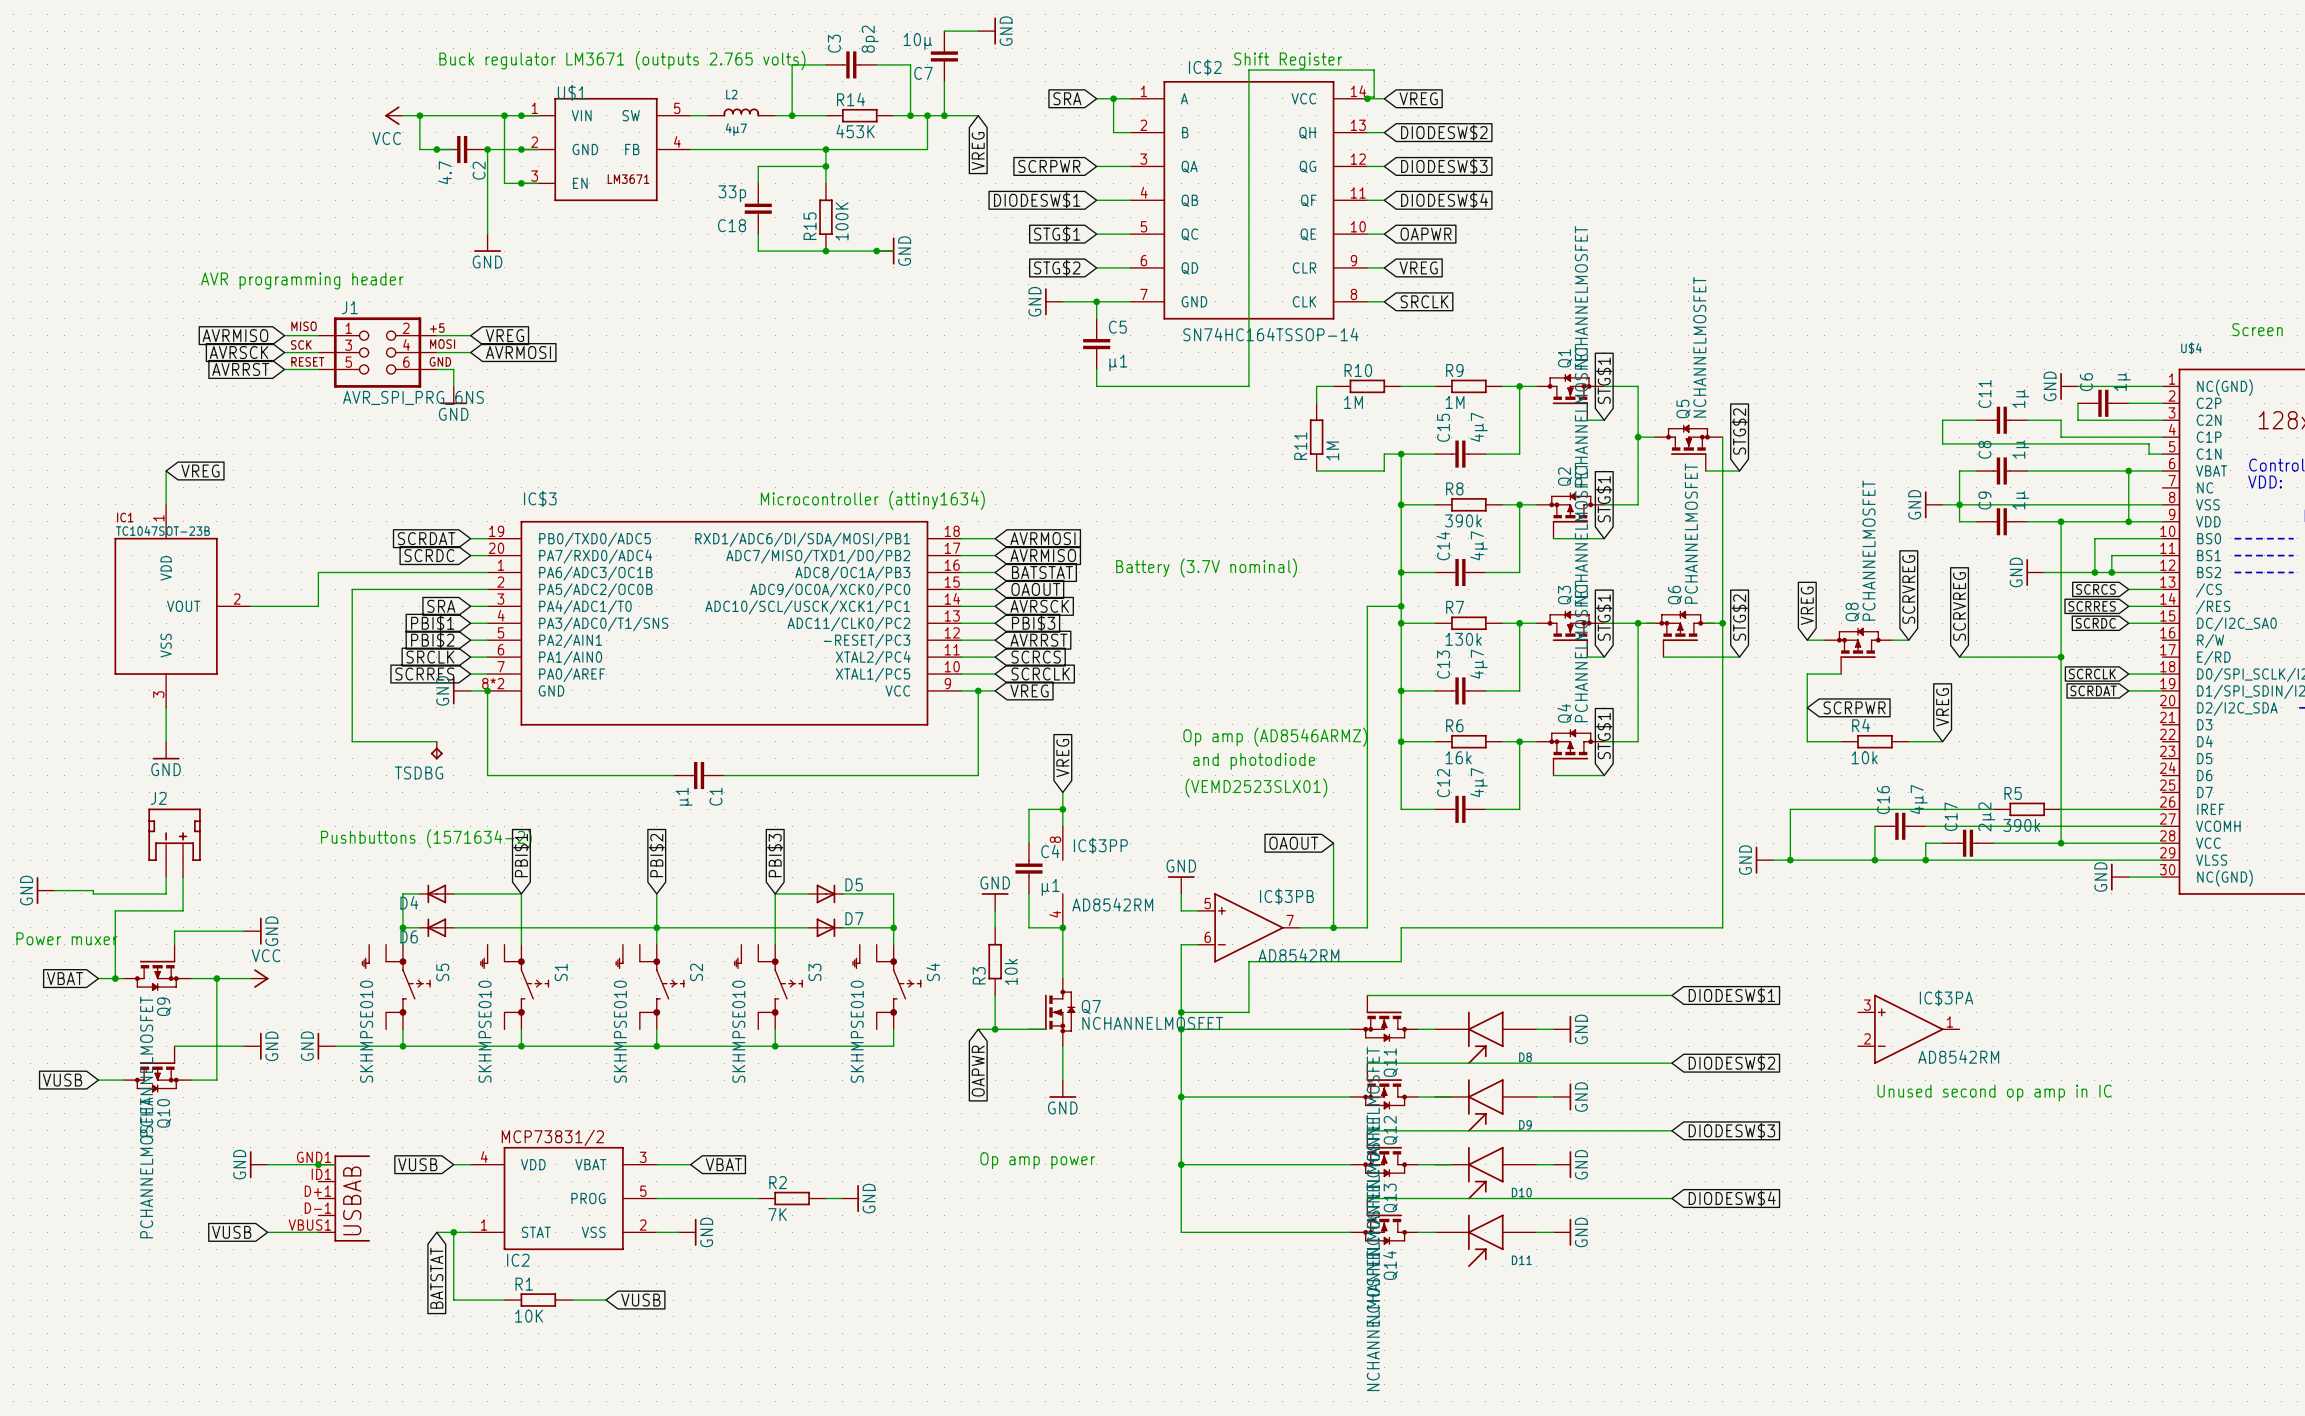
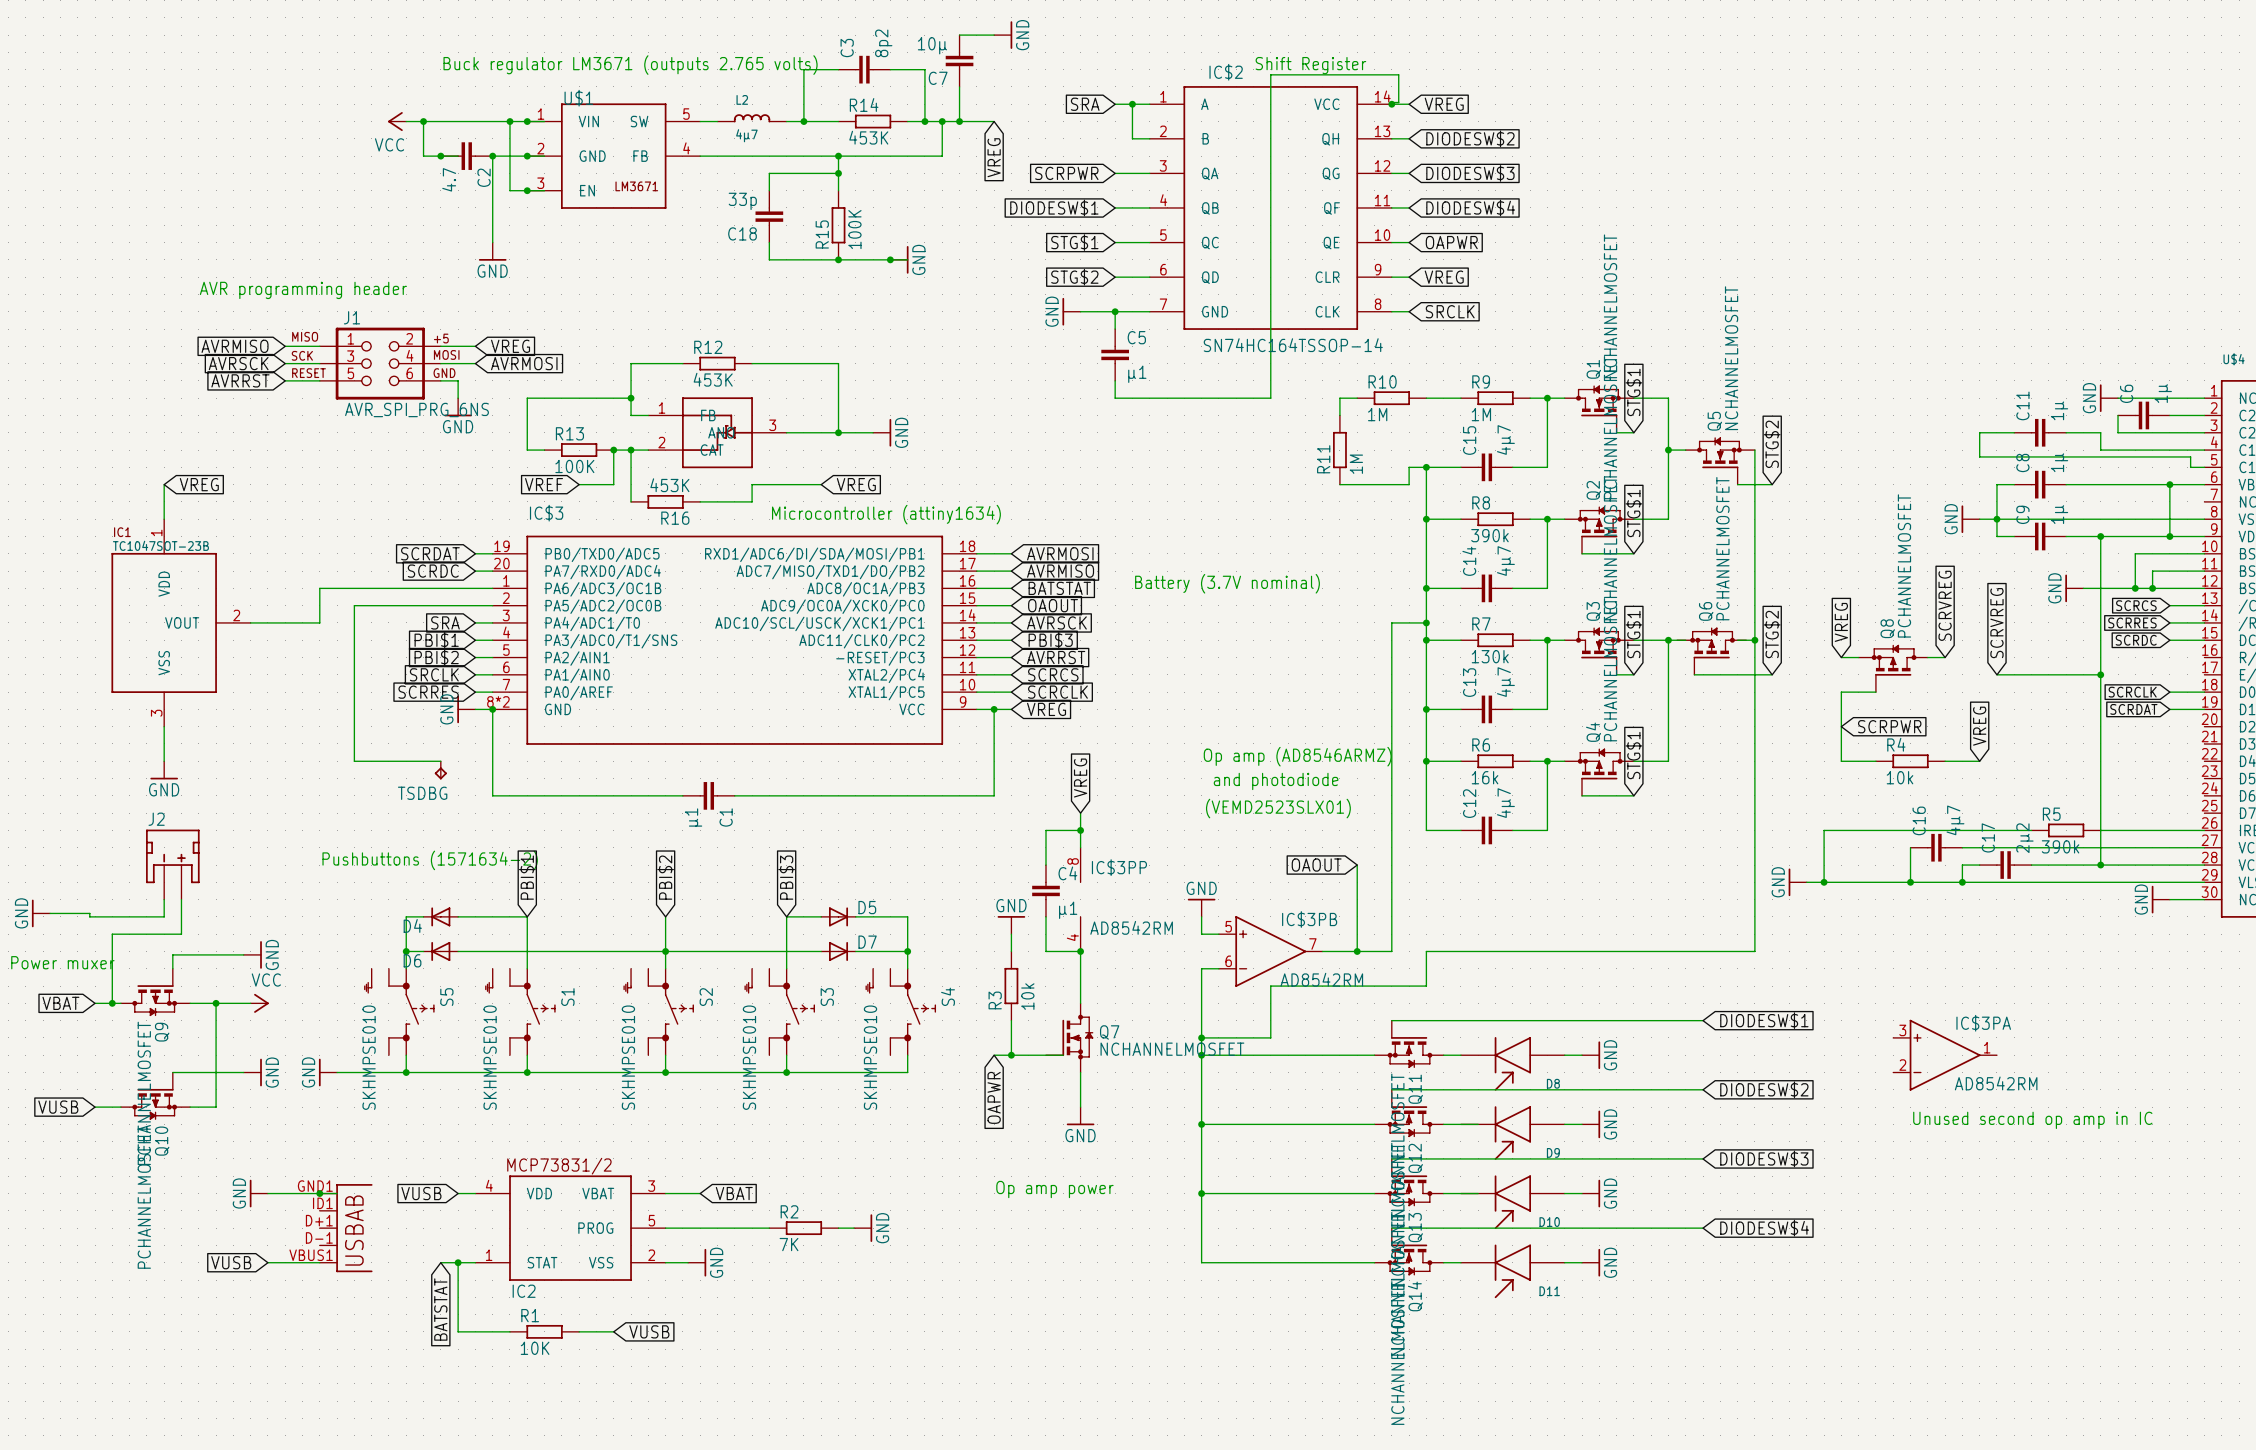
wire: none -> (682, 363) (631, 363) (631, 415) (648, 415)
R12: none -> 453K (717, 363)
wire: none -> (752, 363) (838, 363) (838, 432)
wire: none -> (631, 398) (527, 398) (527, 450) (544, 450)
junction: none -> (631, 398)
part: none -> (717, 432)
wire: none -> (786, 432) (873, 432)
junction: none -> (838, 432)
power symbol: none -> GND (882, 432)
R13: none -> 100K (579, 450)
junction: none -> (613, 450)
wire: none -> (631, 450) (631, 501)
junction: none -> (631, 450)
wire: none -> (648, 450) (613, 450) (613, 484) (579, 484)
global label: none -> VREF (544, 484)
wire: none -> (821, 484) (752, 484) (752, 501) (700, 501)
global label: none -> VREG (856, 484)
R16: none -> 453K (665, 501)

